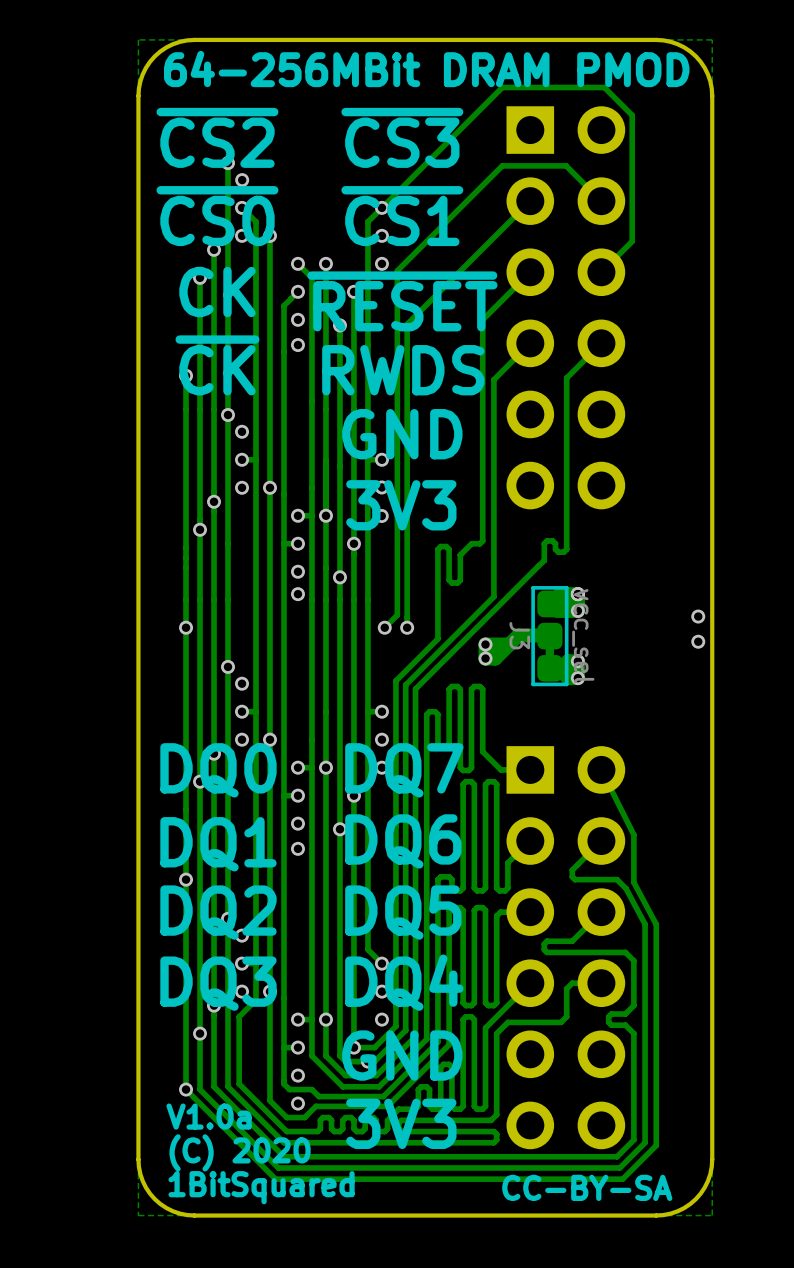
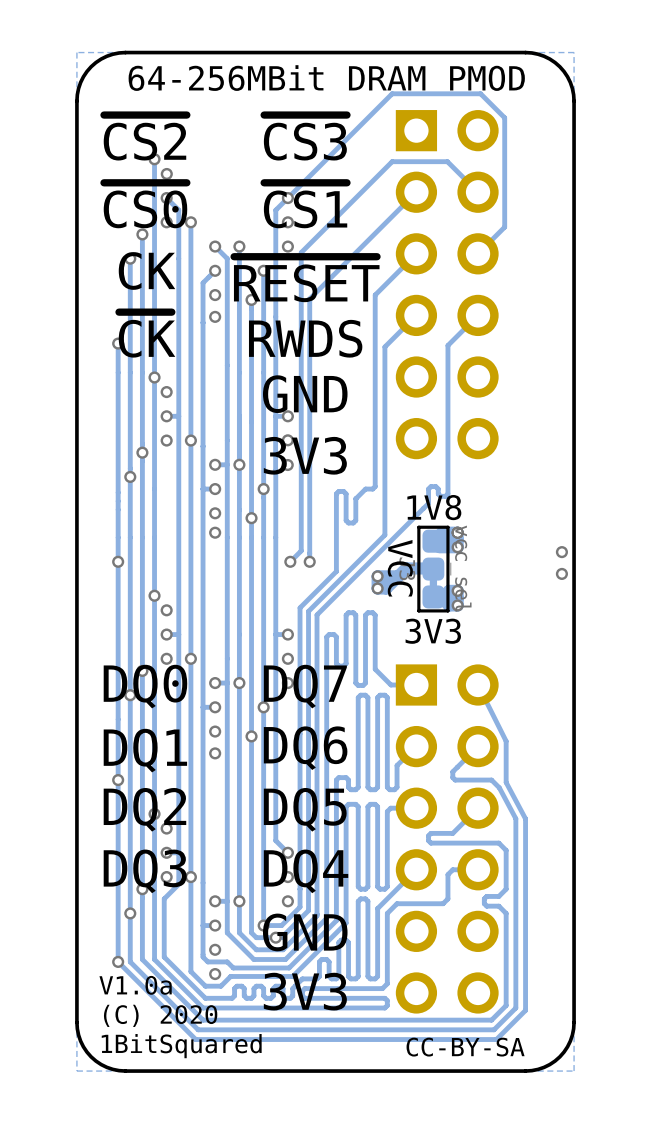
text: none -> 1V8 (434, 507)
text: none -> VCC (400, 568)
text: none -> 3V3 (433, 631)

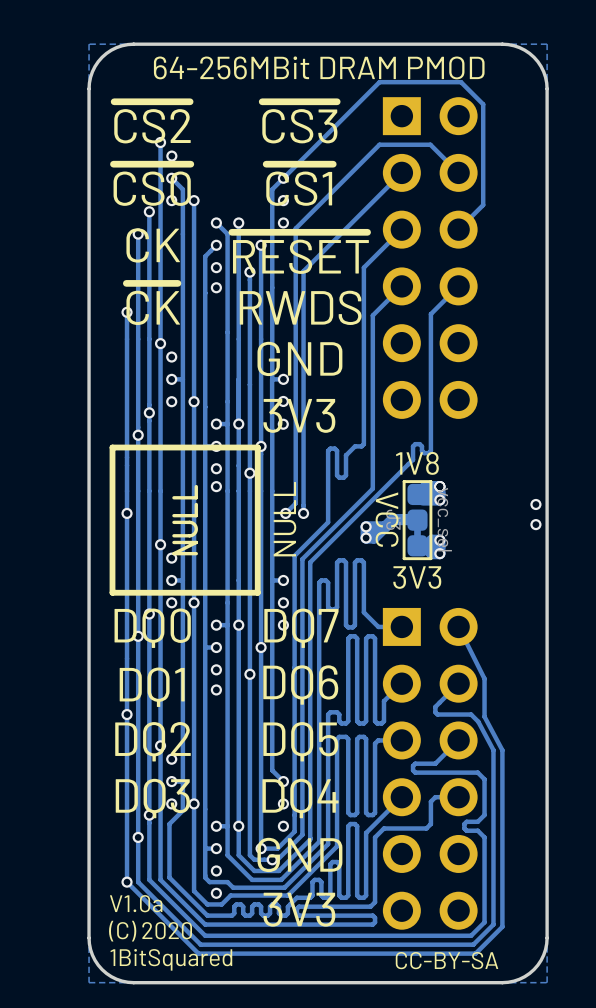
drawing: none -> [109, 444, 261, 596]
text: none -> NULL (284, 519)

